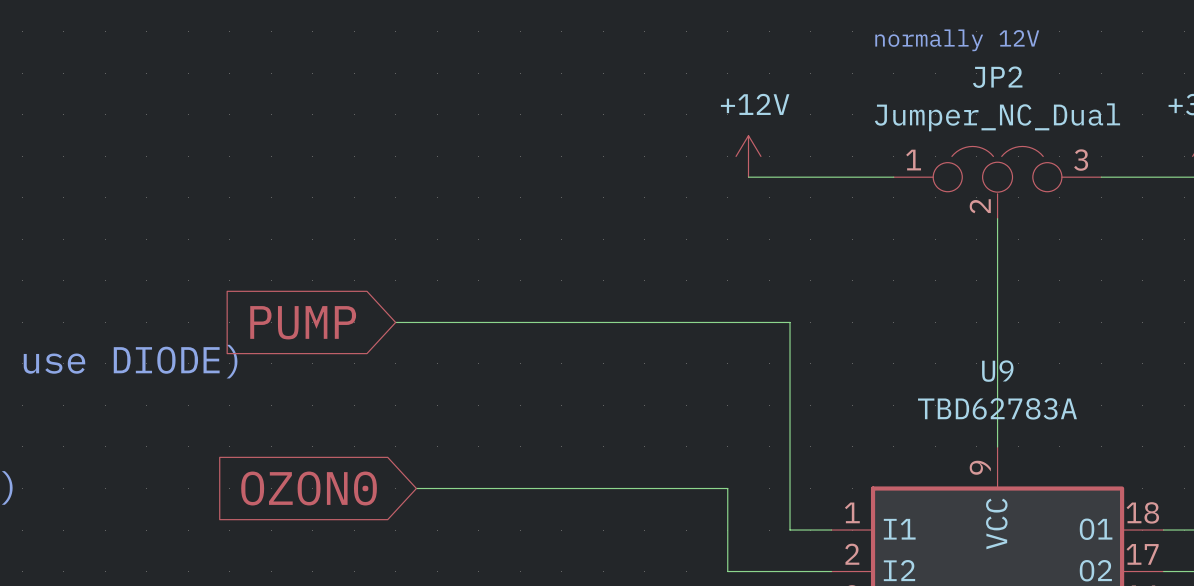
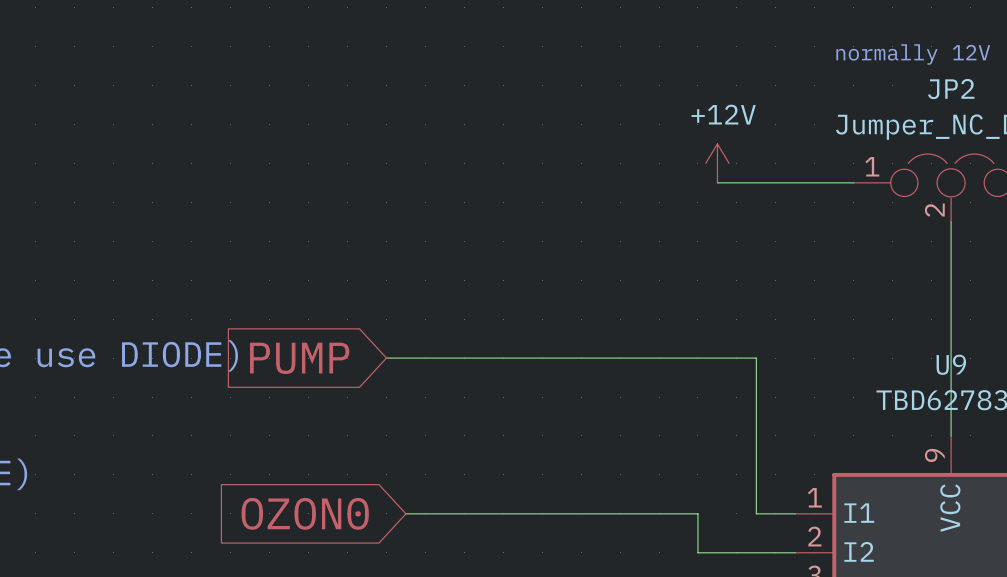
global label position: PUMP (303, 322) -> PUMP (299, 358)
wire: (395, 322) (790, 322) (790, 363) -> (386, 358) (756, 358)
global label position: OZON0 (309, 488) -> OZON0 (305, 513)
wire: (416, 488) (727, 488) (727, 530) -> (405, 513) (697, 513)

